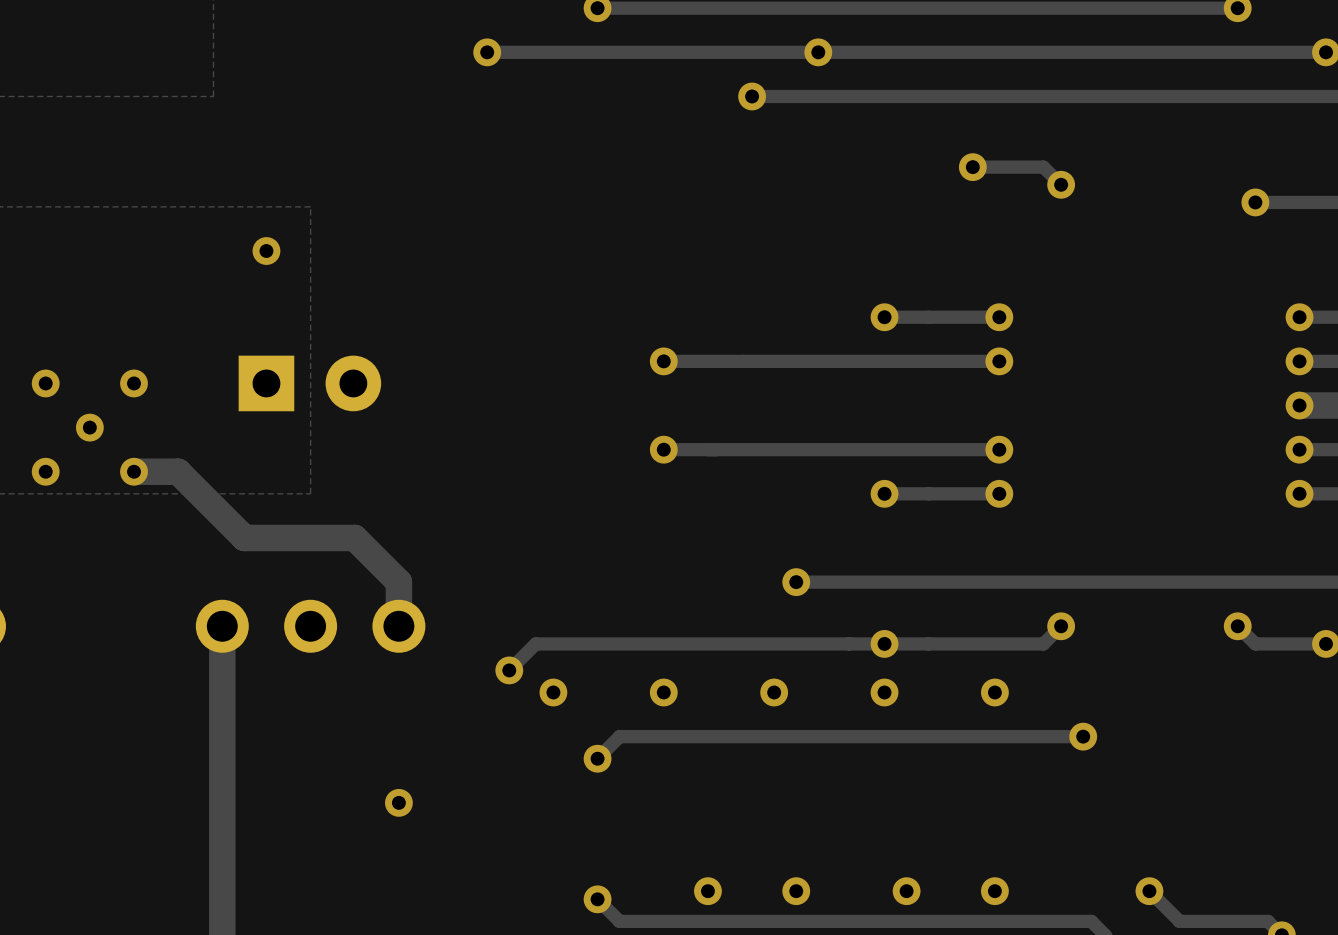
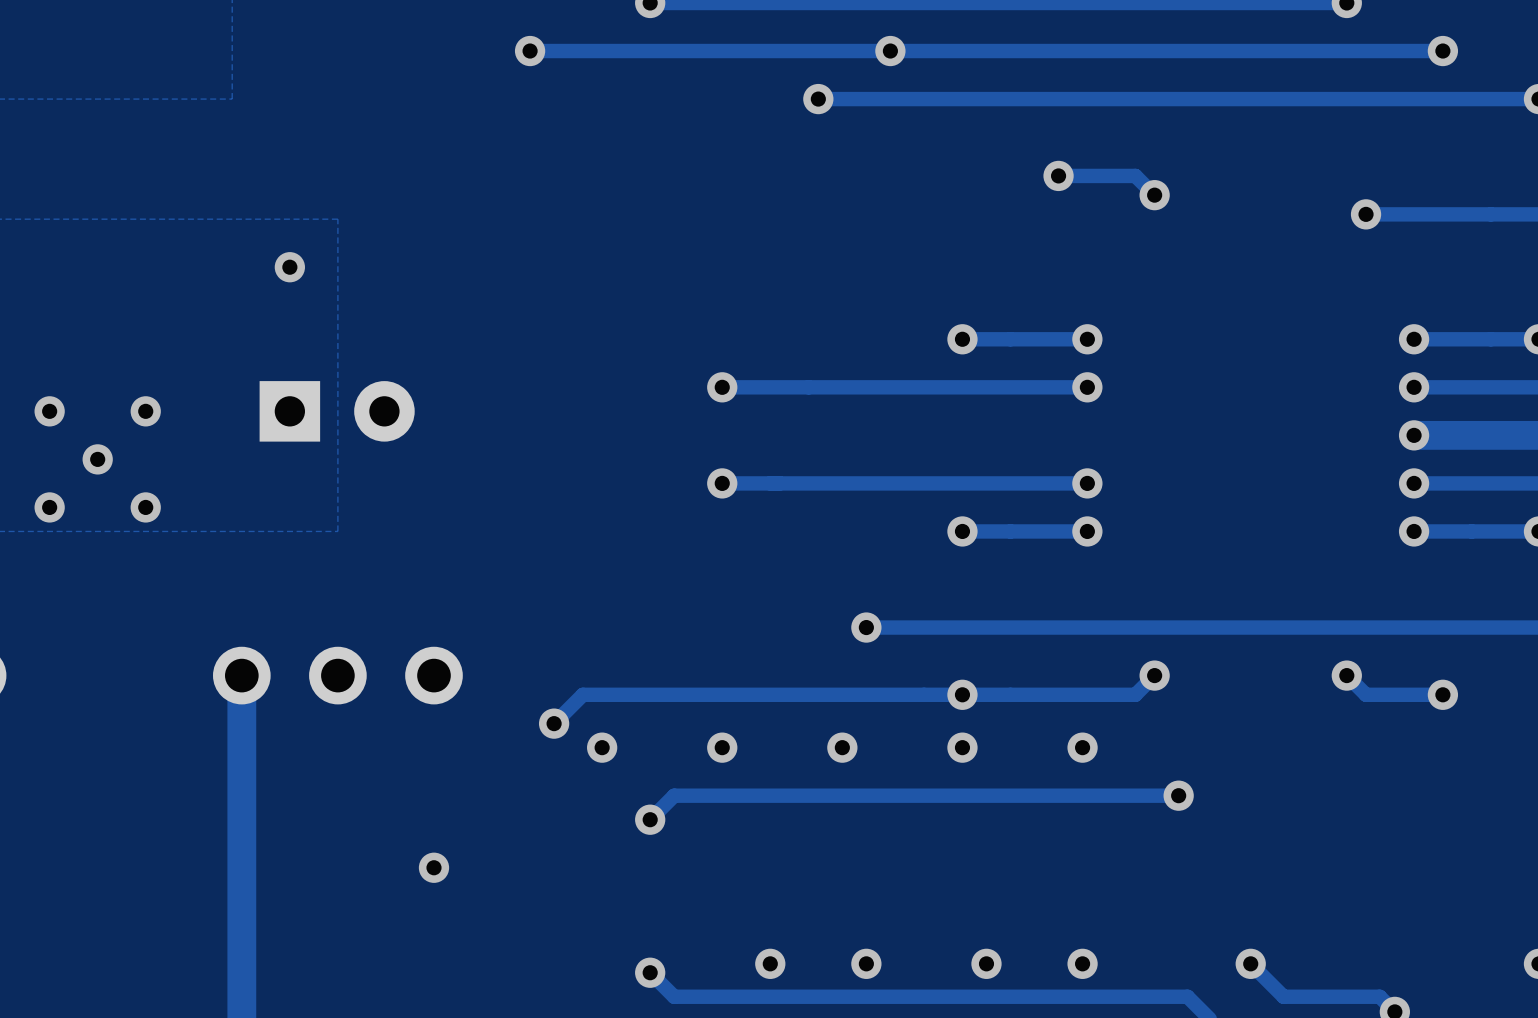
track: (134, 471) (178, 471) (244, 537) (354, 537) (398, 582) (398, 626) -> none

